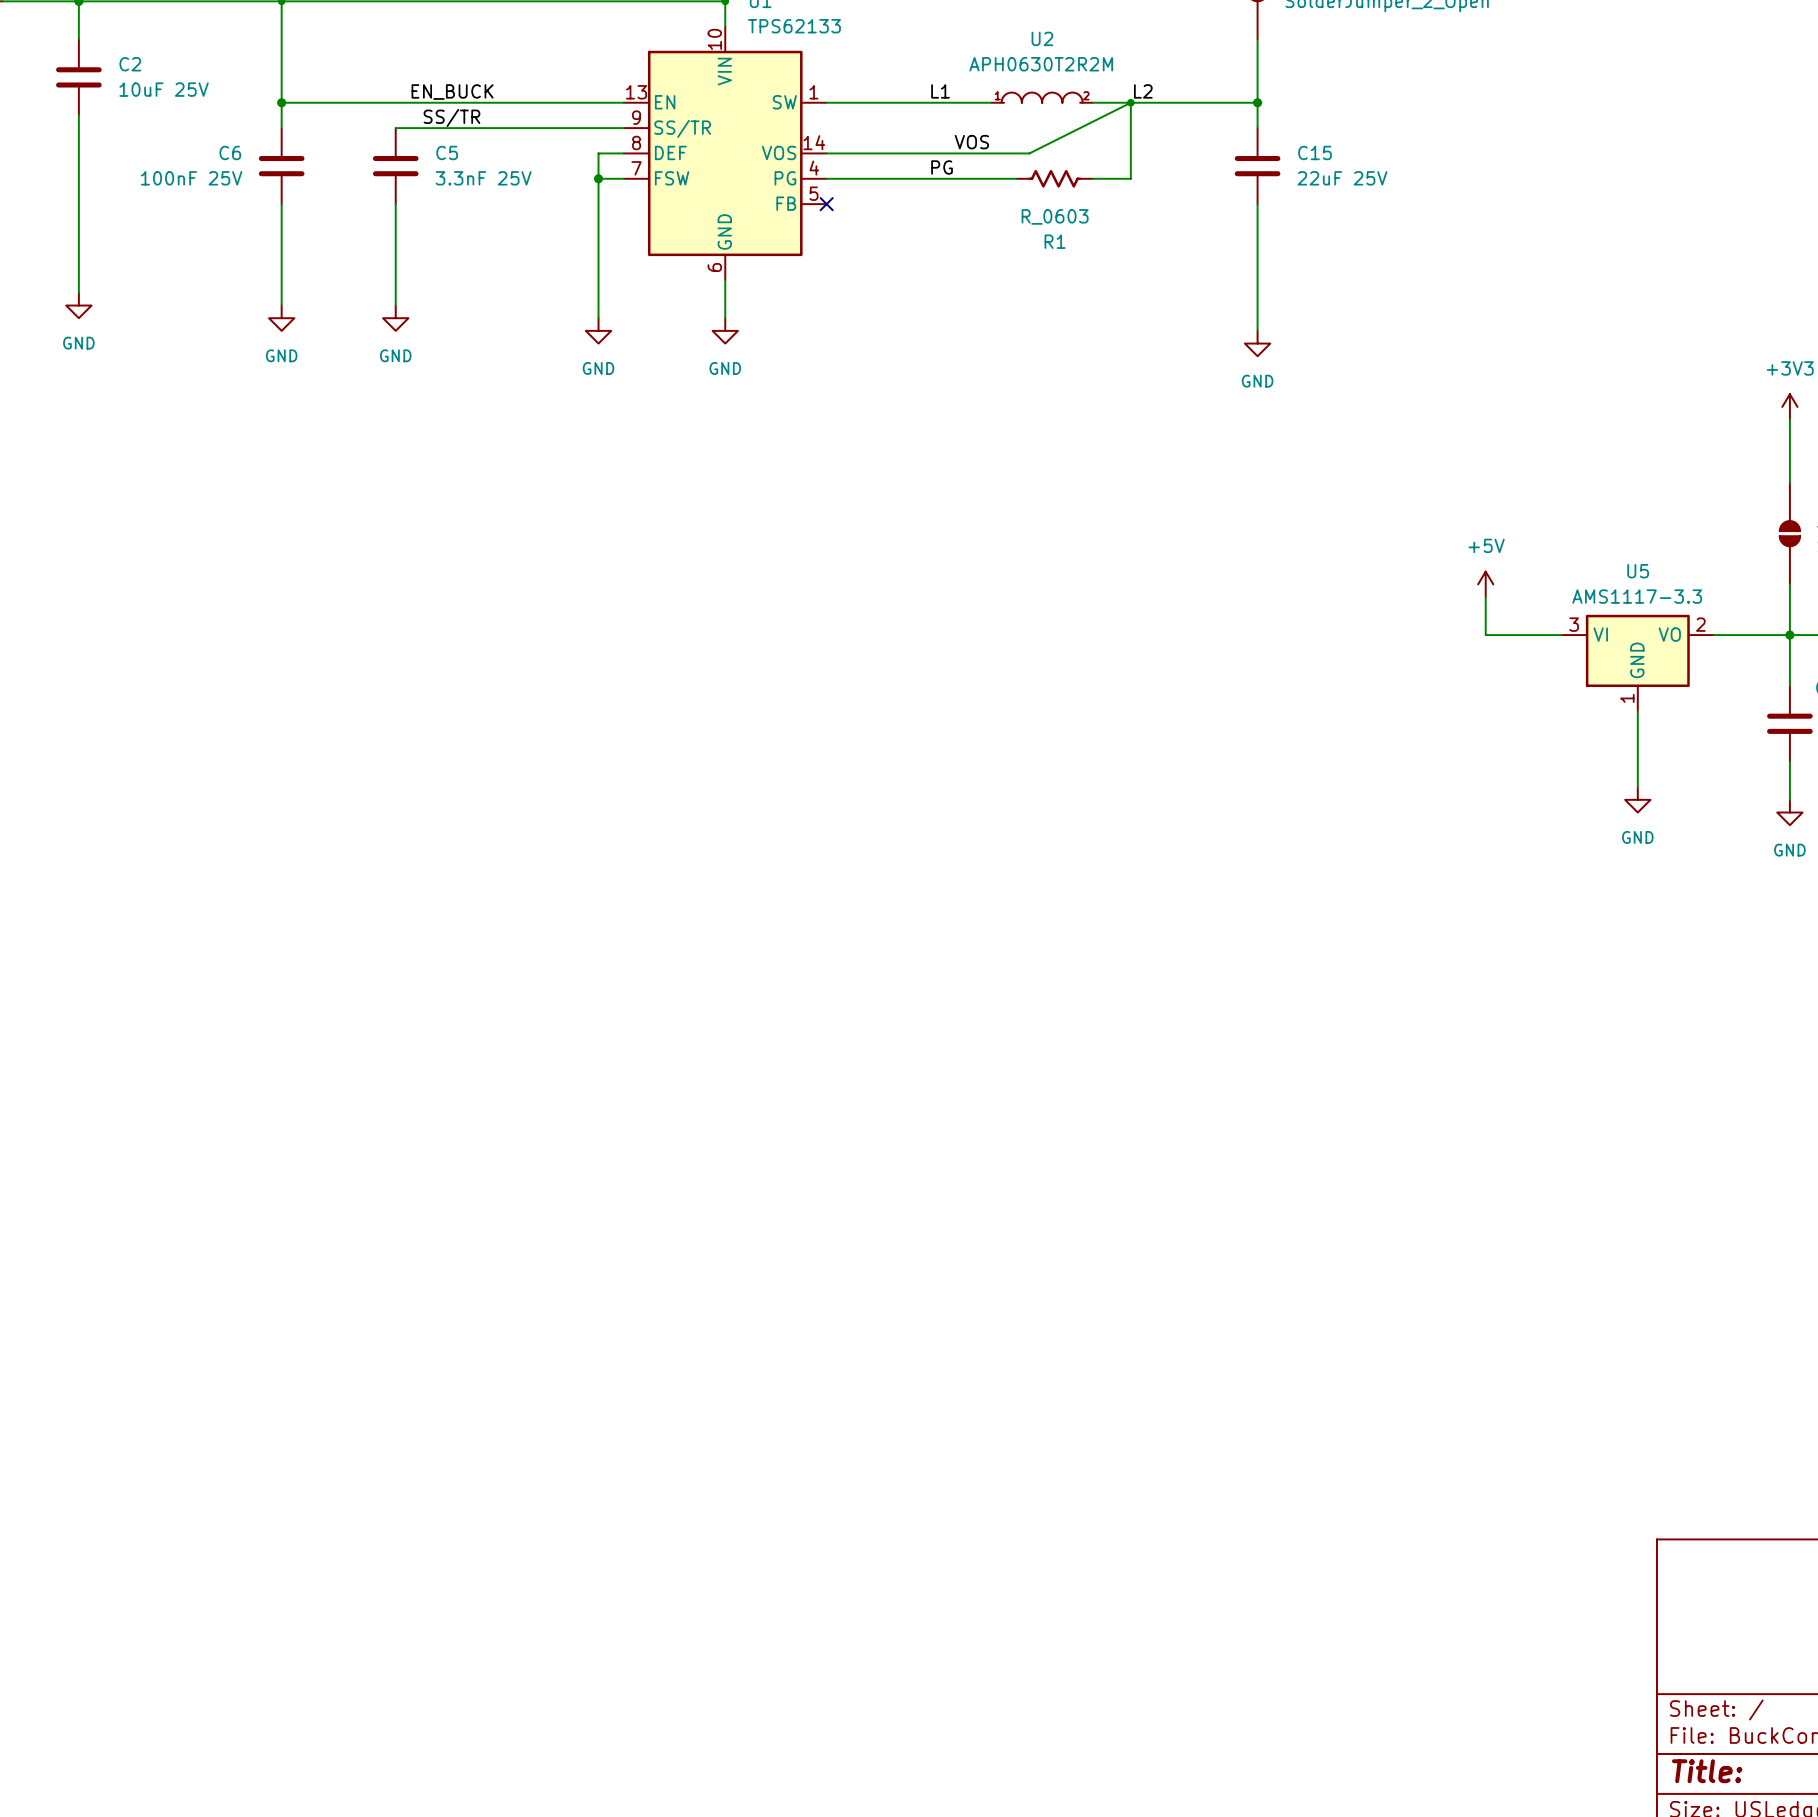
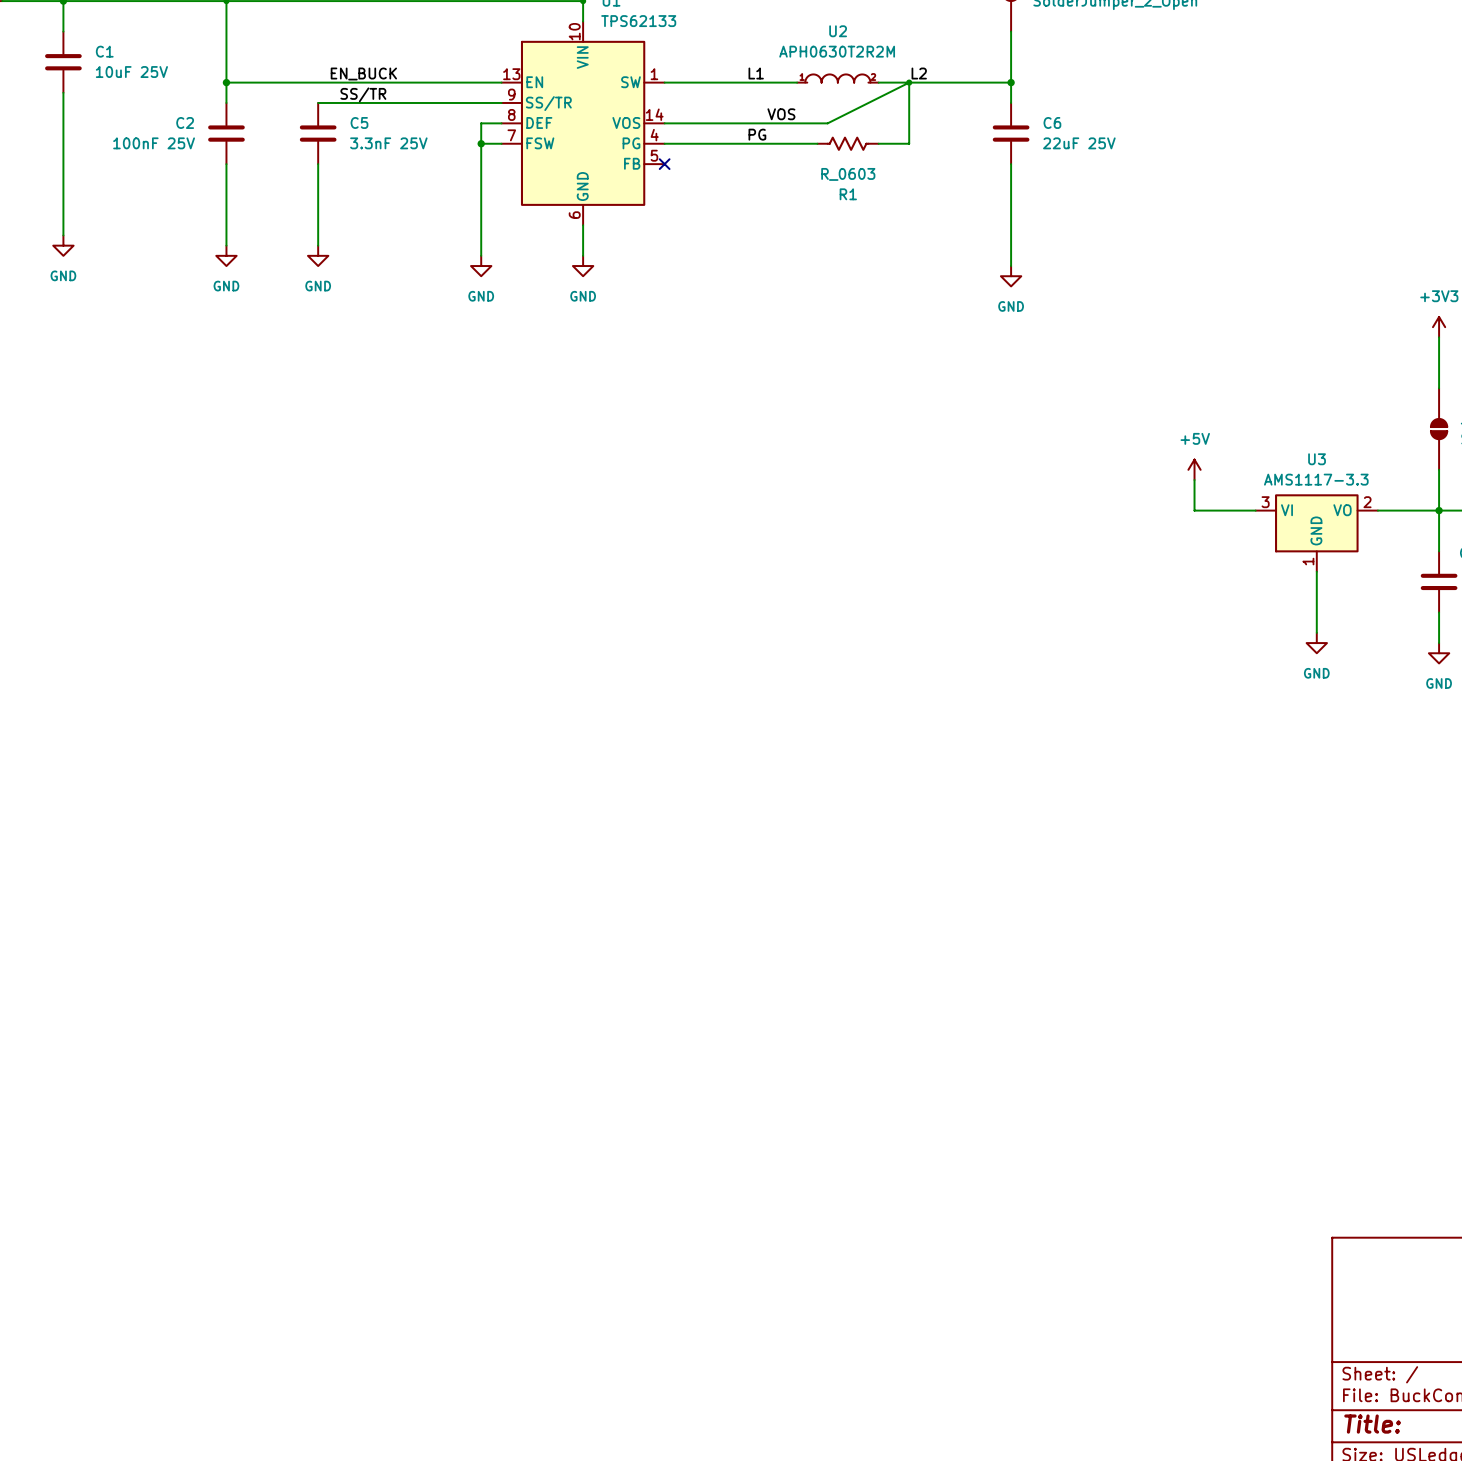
C2 name: C2 (130, 64) -> C1 (104, 51)
C6 name: C6 (230, 152) -> C2 (185, 122)
C15 name: C15 (1315, 152) -> C6 (1052, 122)
U5 name: U5 (1638, 571) -> U3 (1317, 459)

